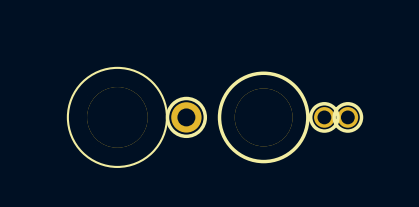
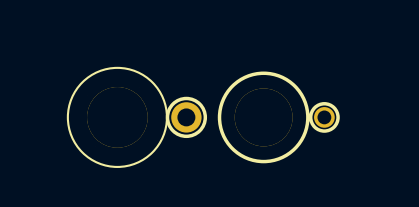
part: (347, 117) -> none

